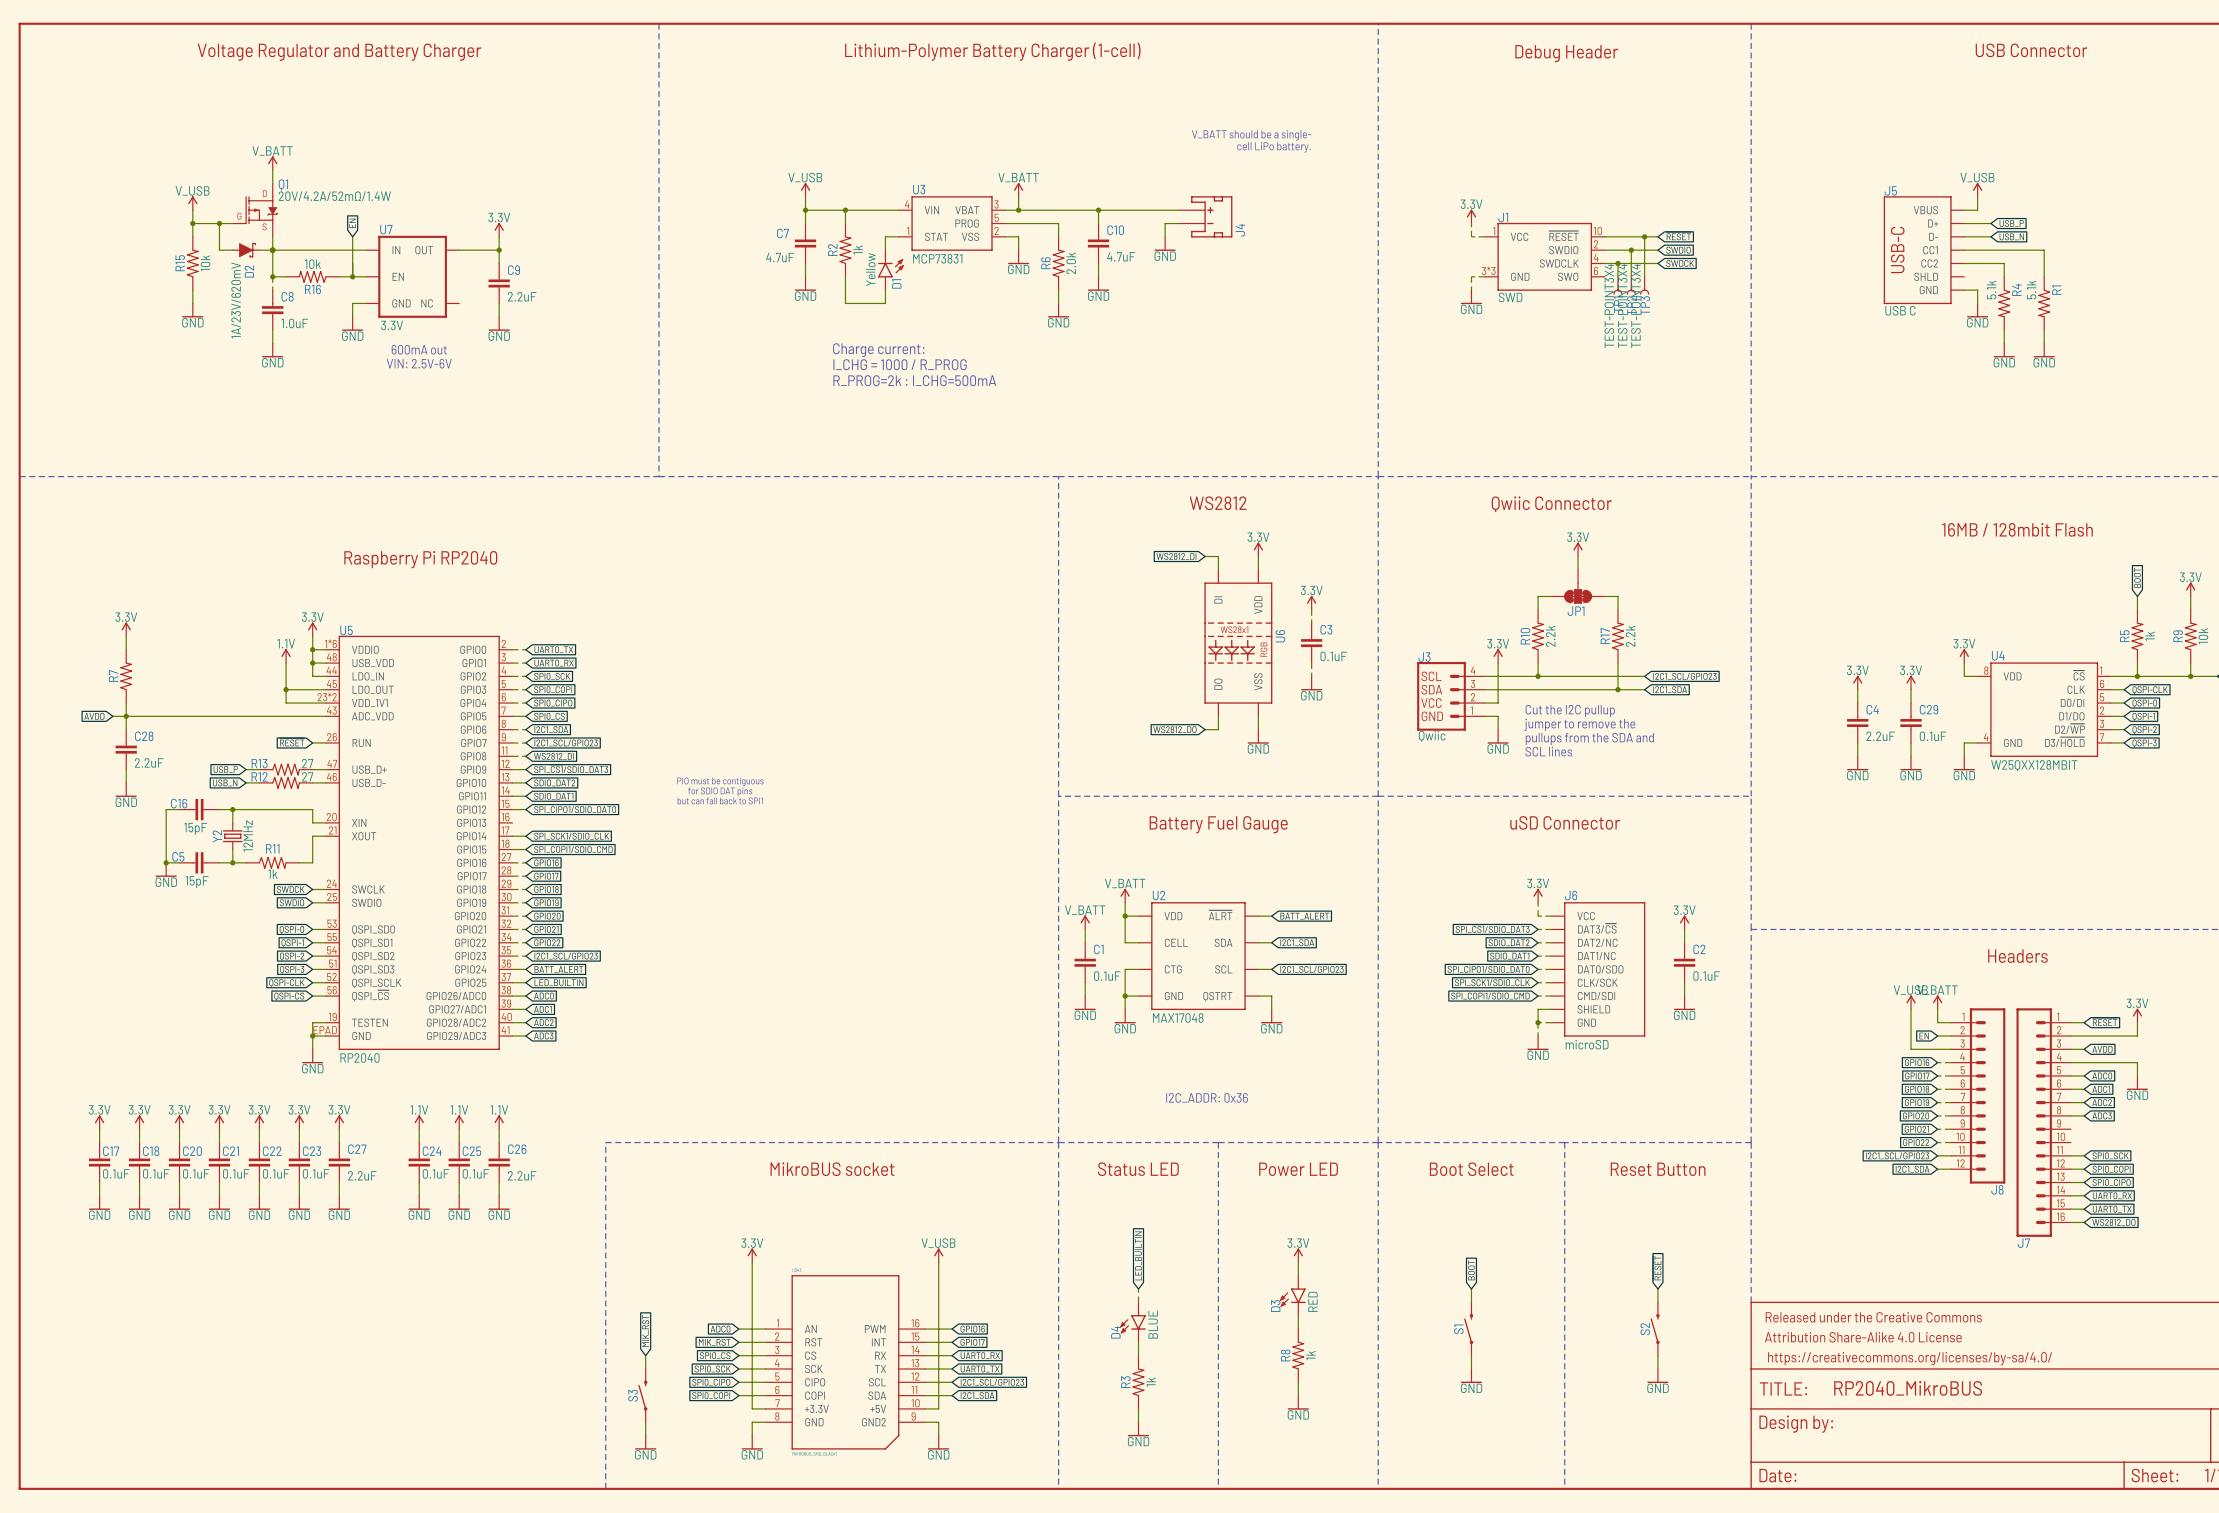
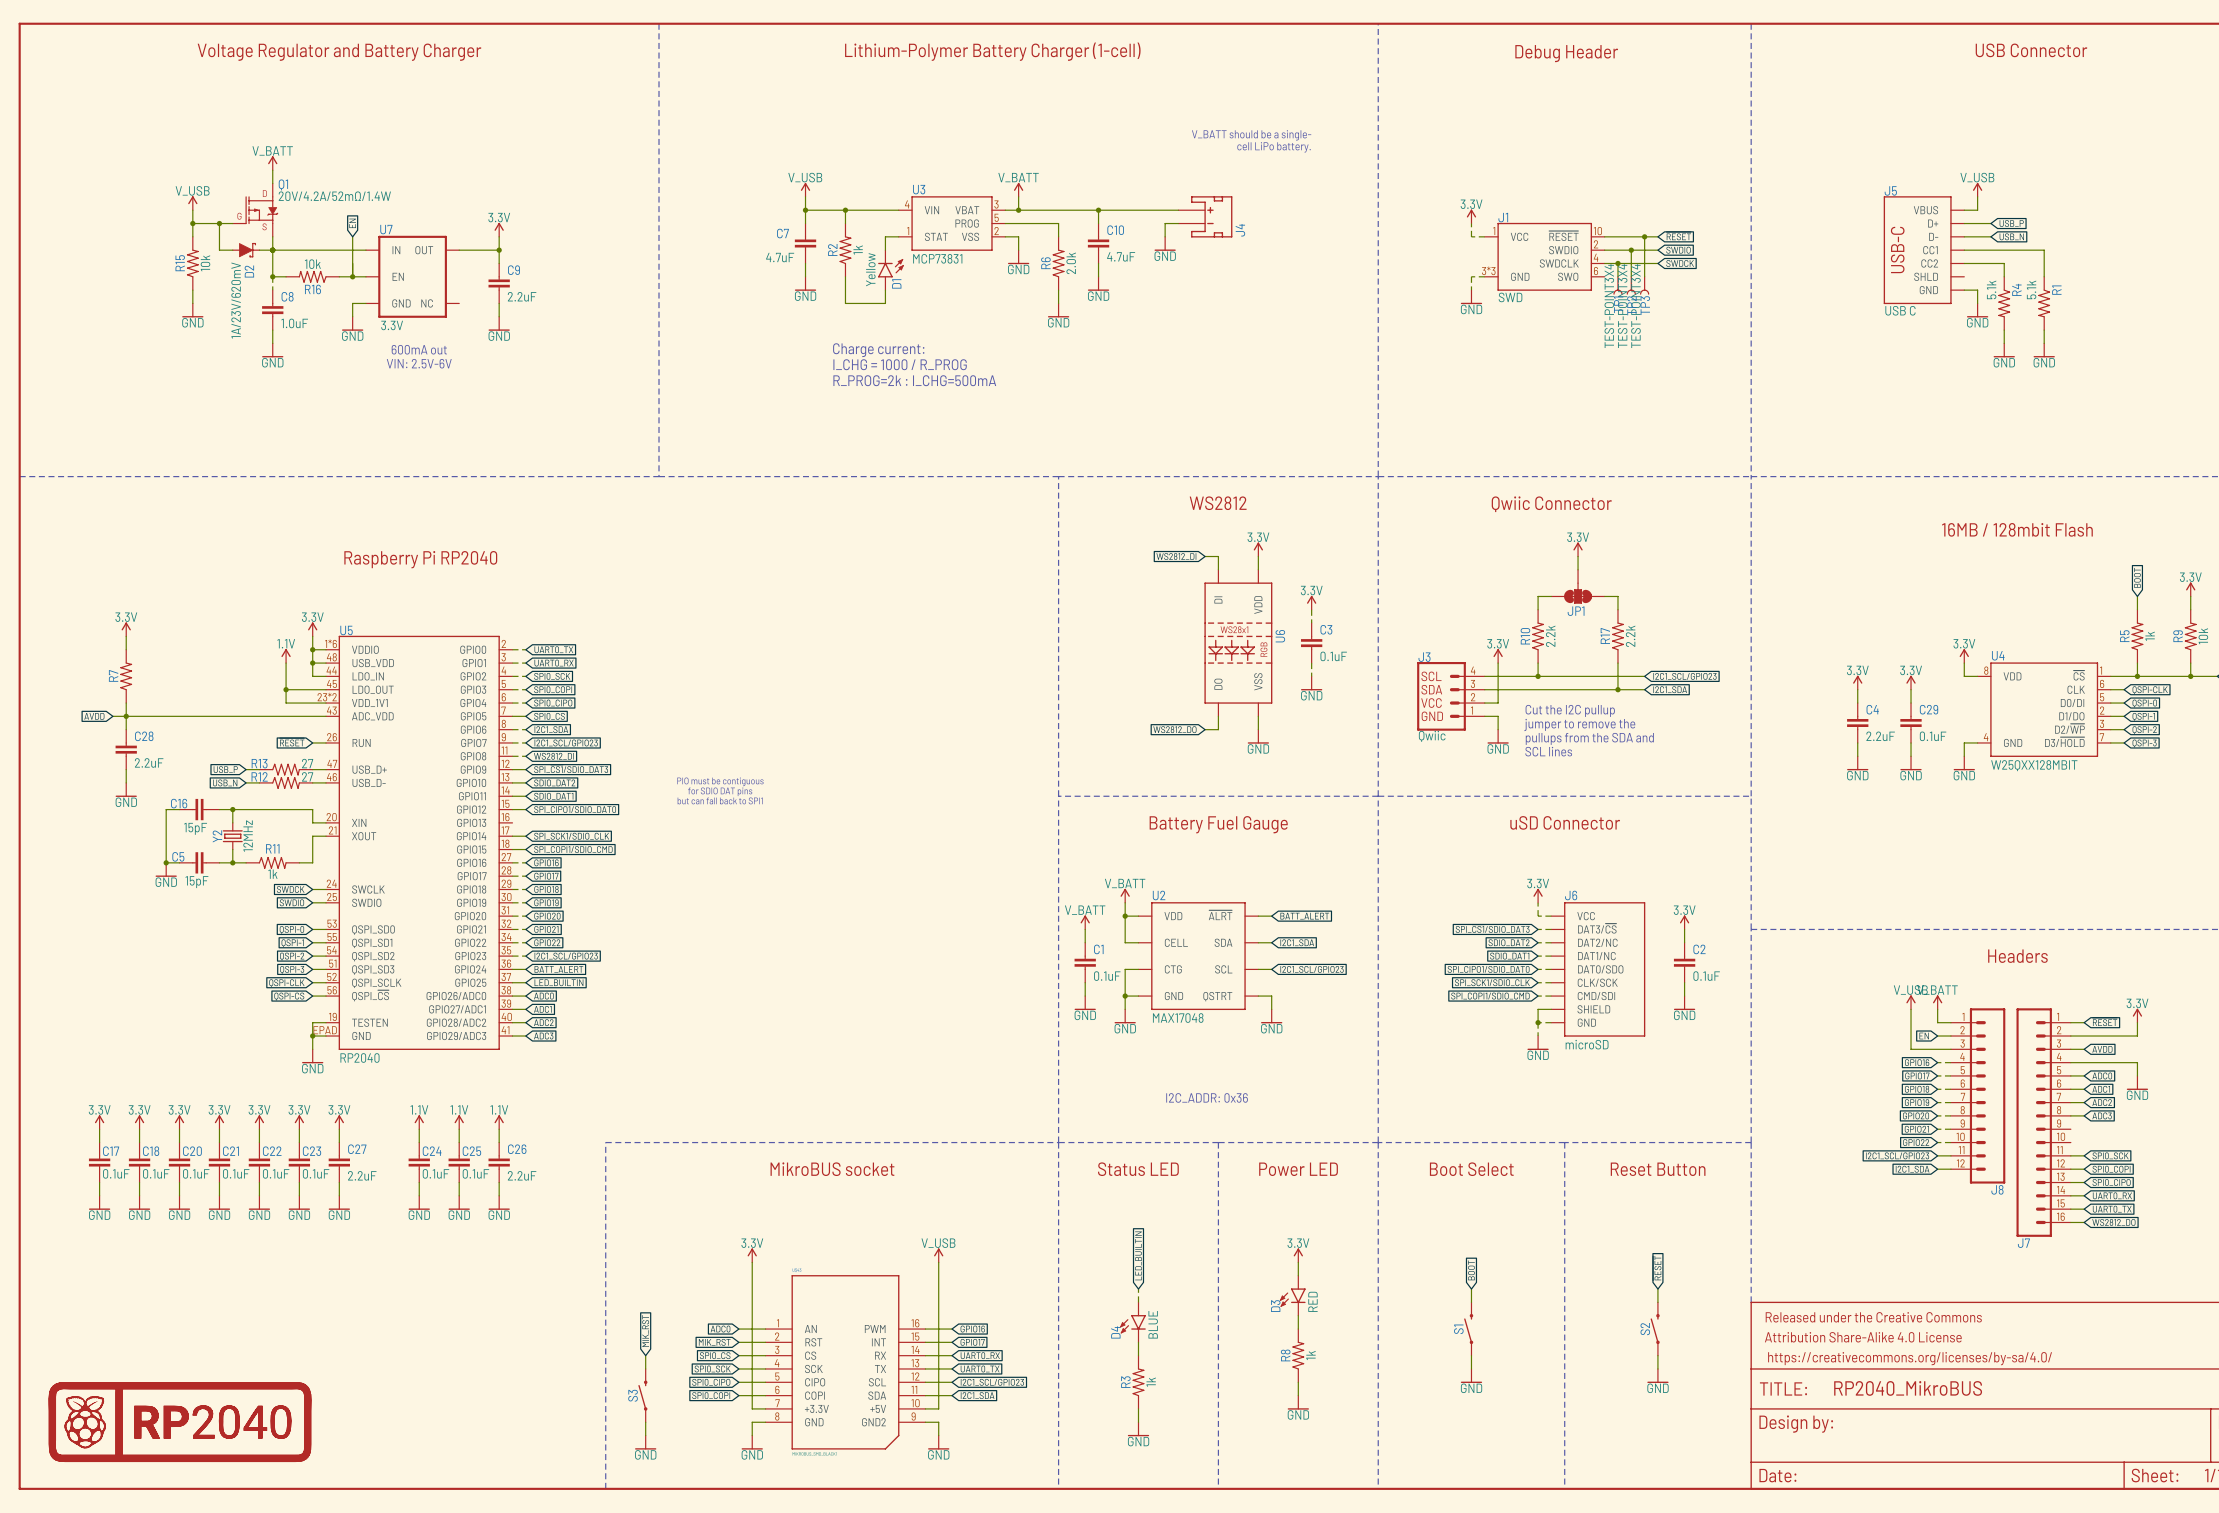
part: none -> (180, 1422)

